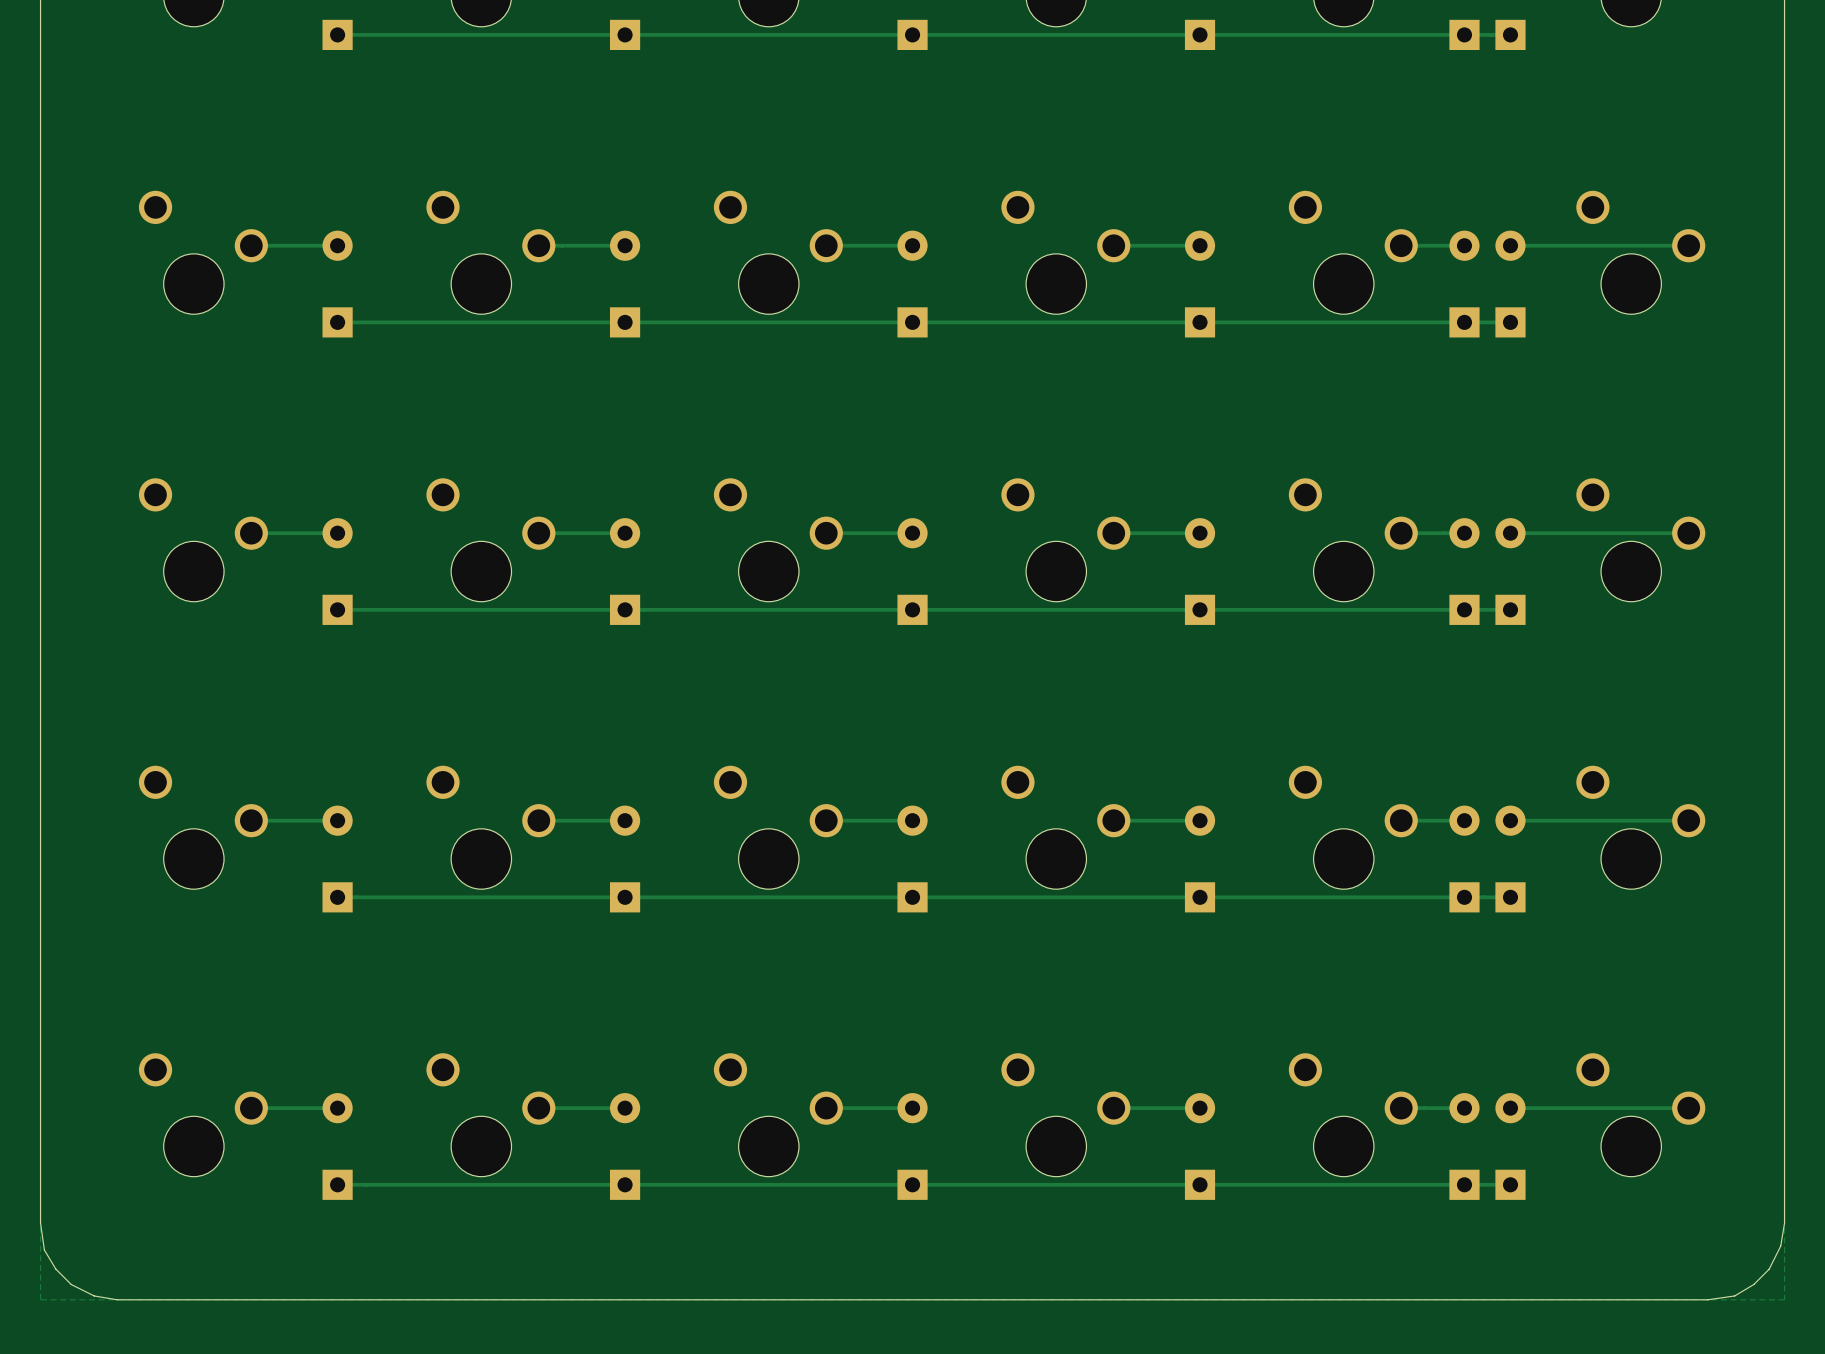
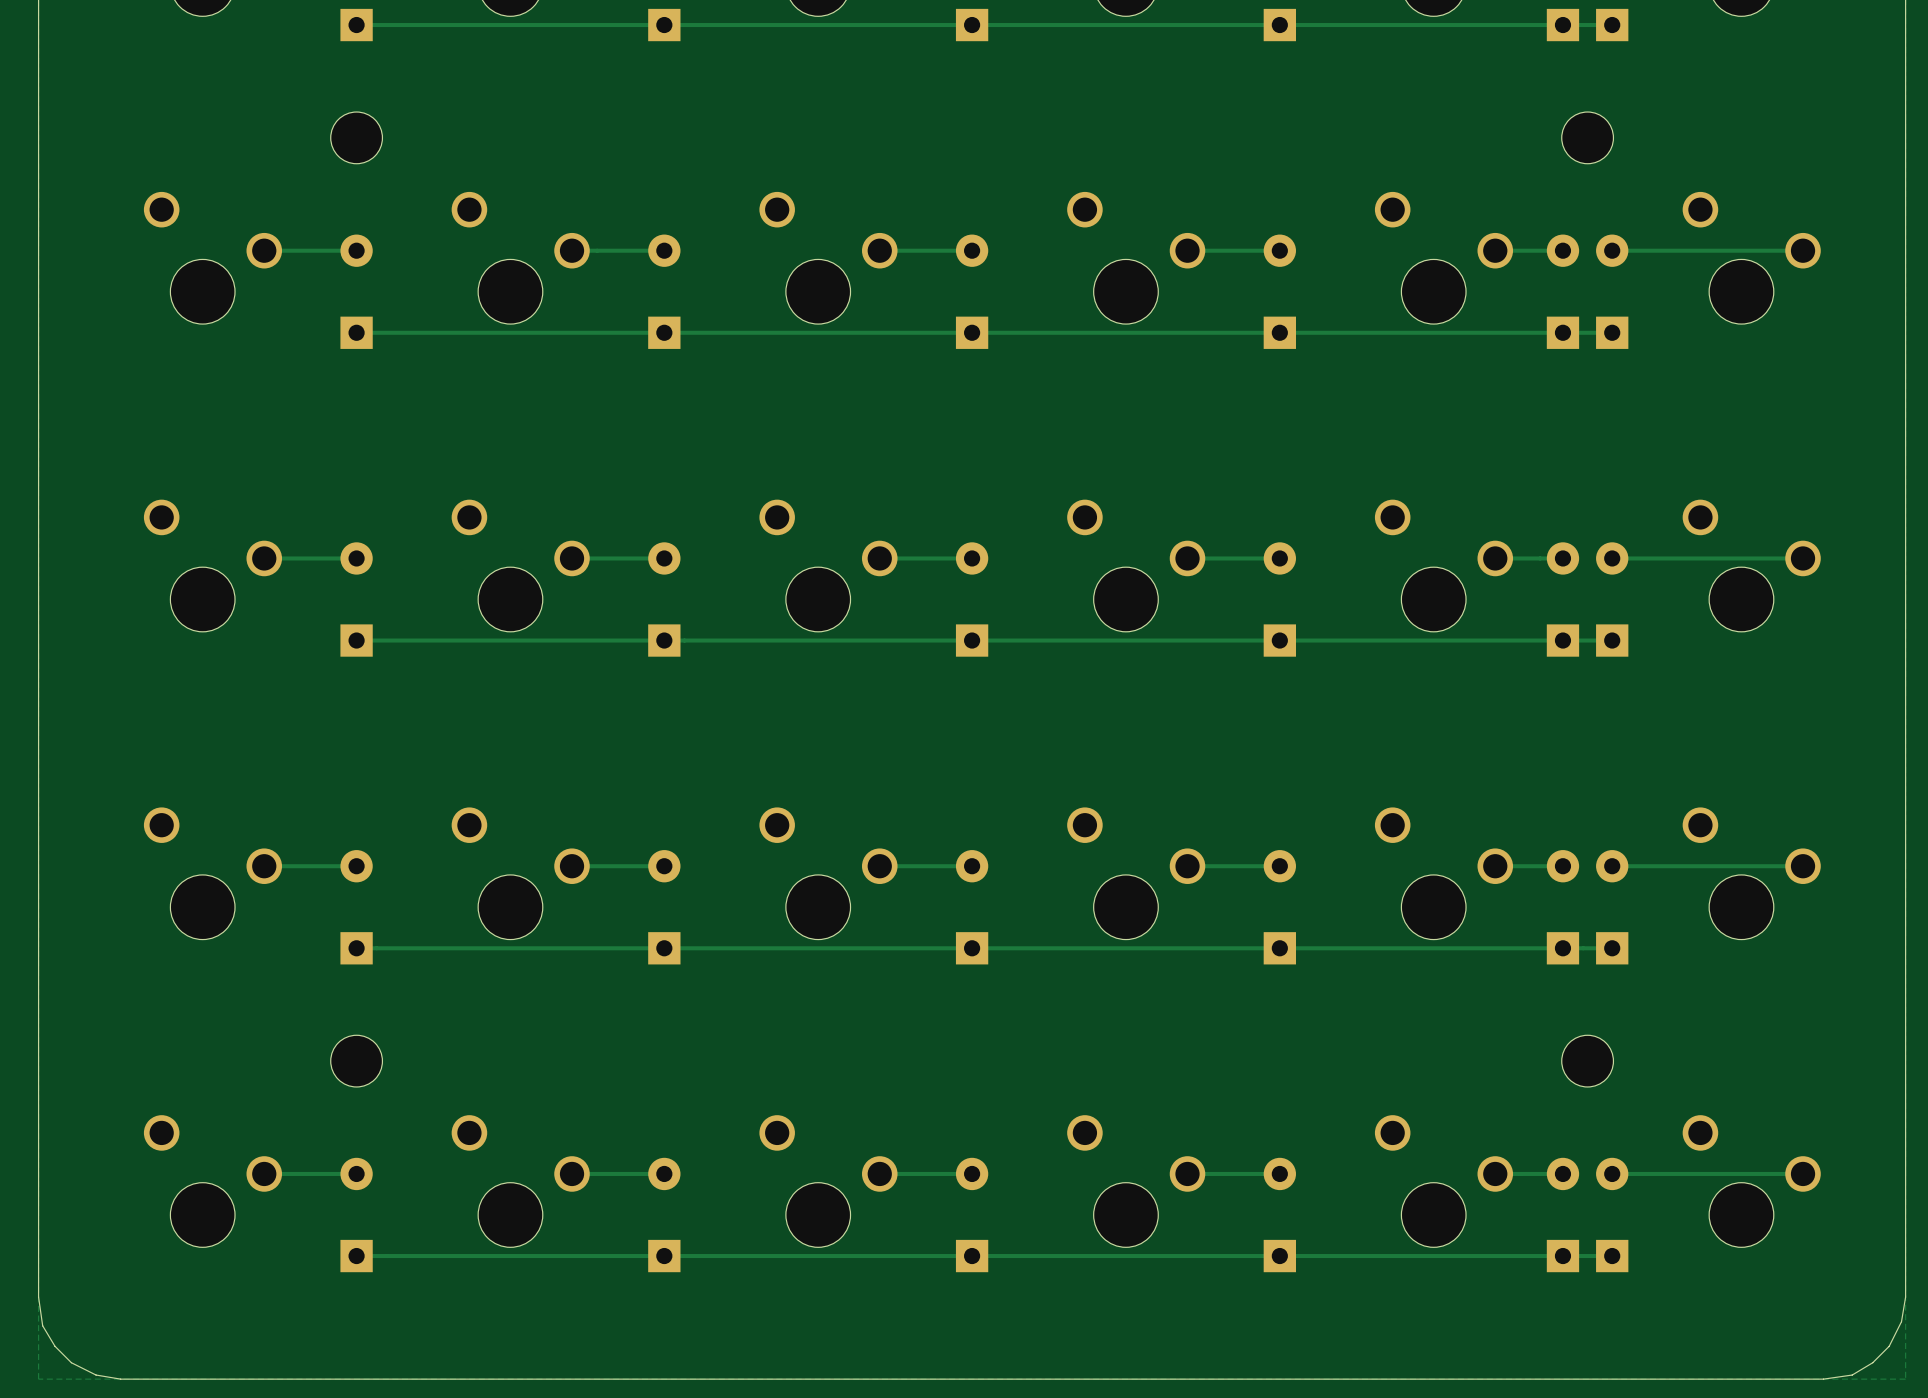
part: none -> (356, 137)
part: none -> (1587, 137)
part: none -> (356, 1061)
part: none -> (1587, 1061)

